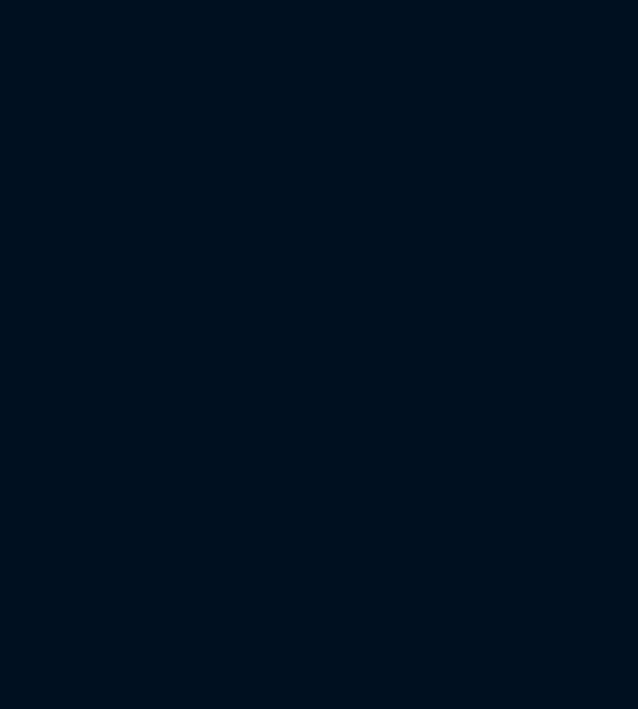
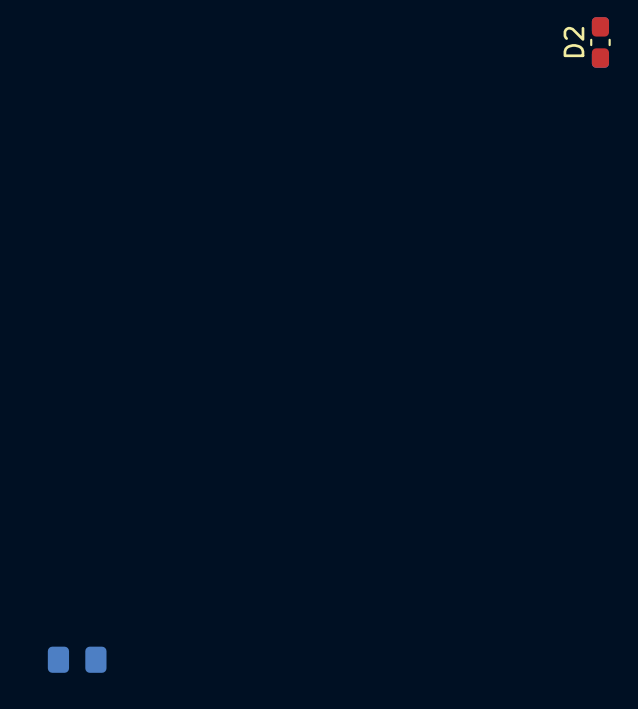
D2: none -> (600, 42)
part: none -> (77, 659)

